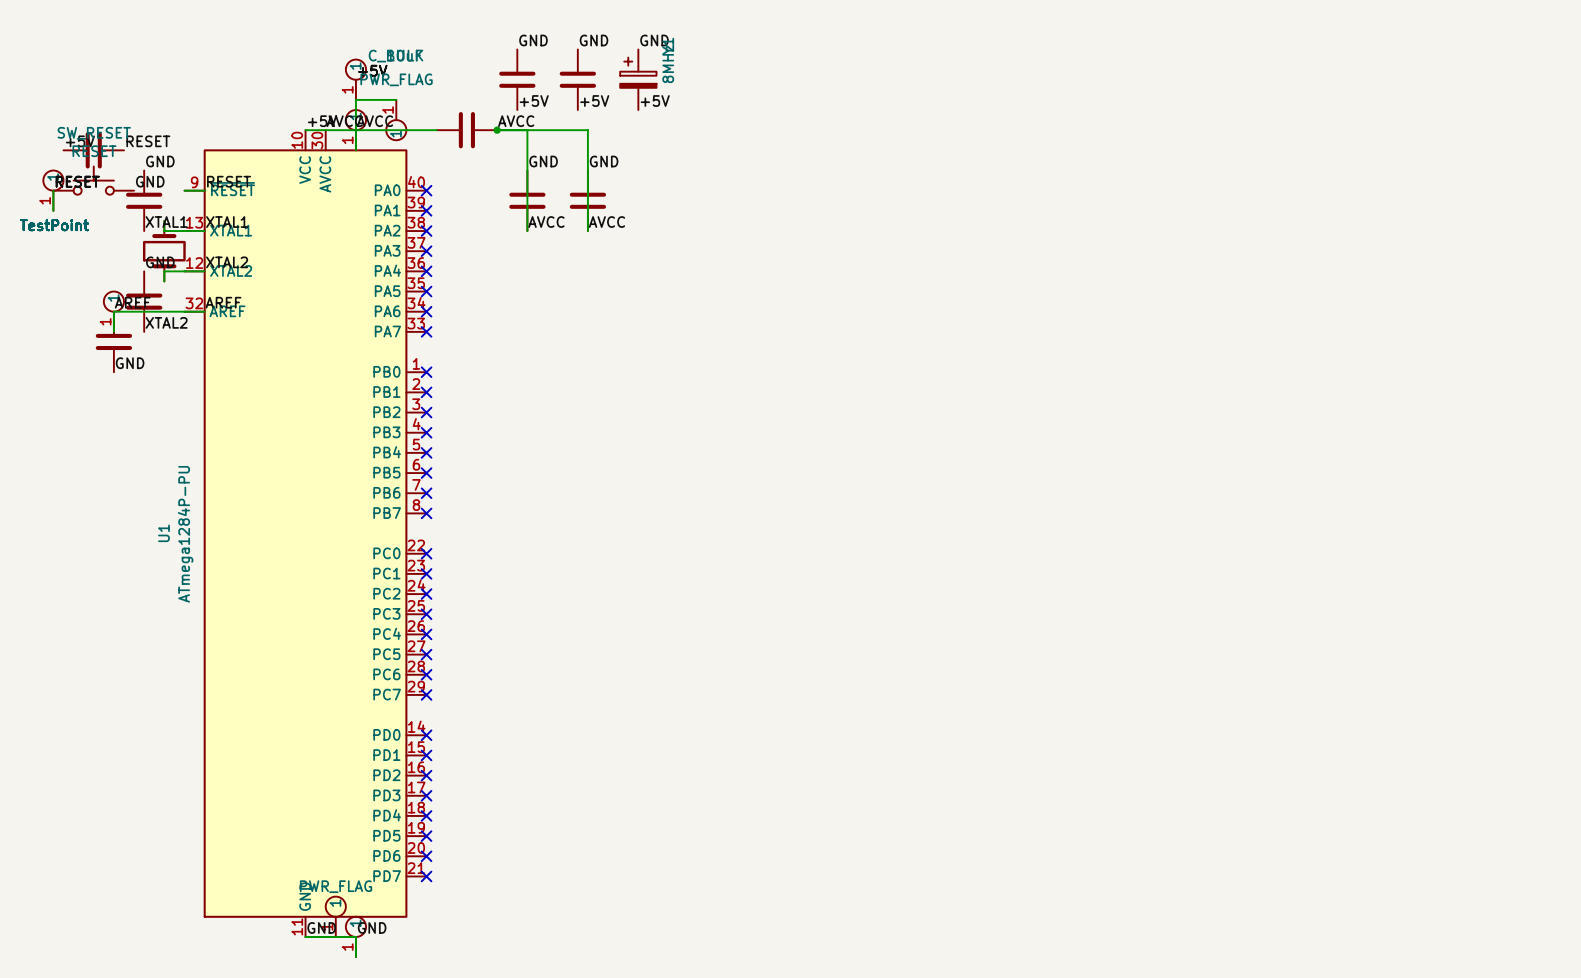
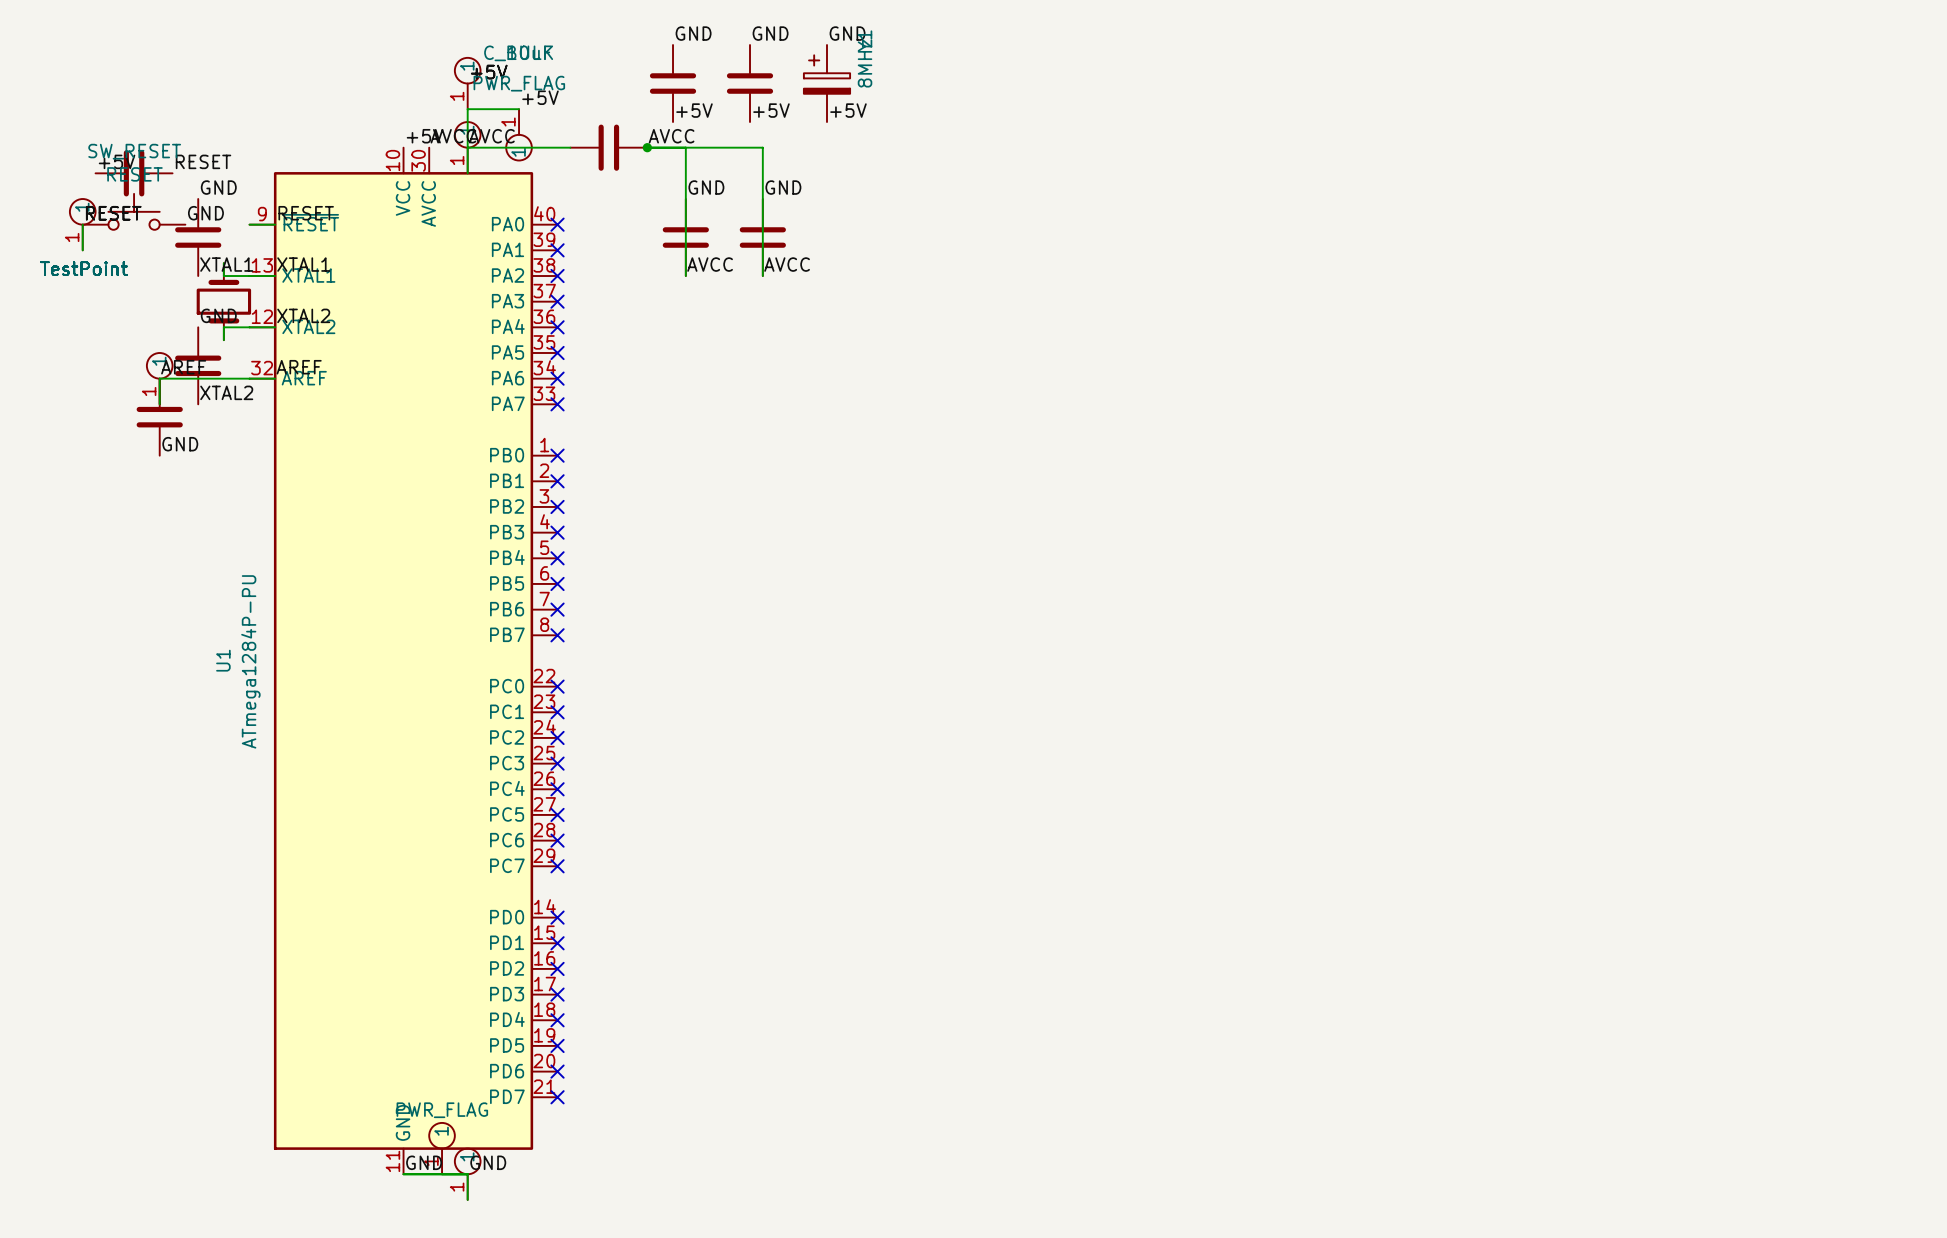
label: none -> +5V (540, 97)
wire: (305, 130) (355, 130) -> none

